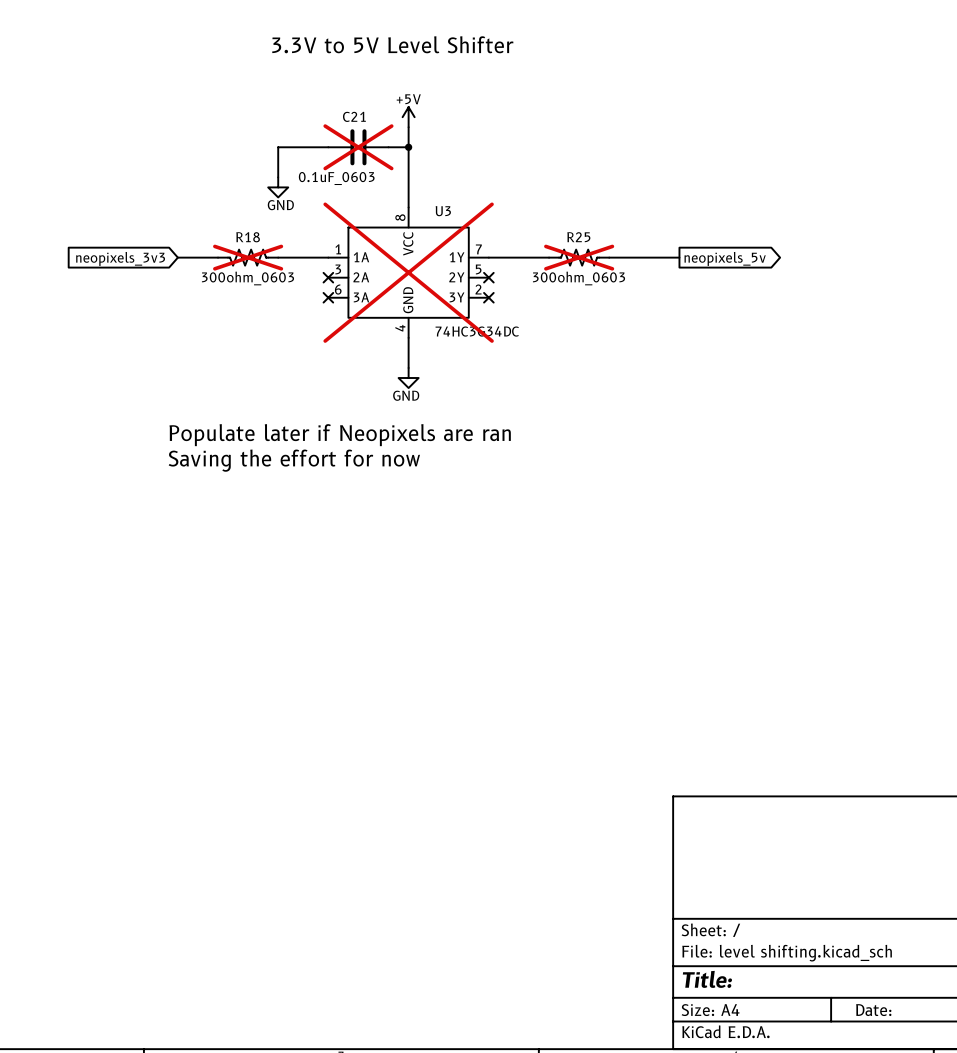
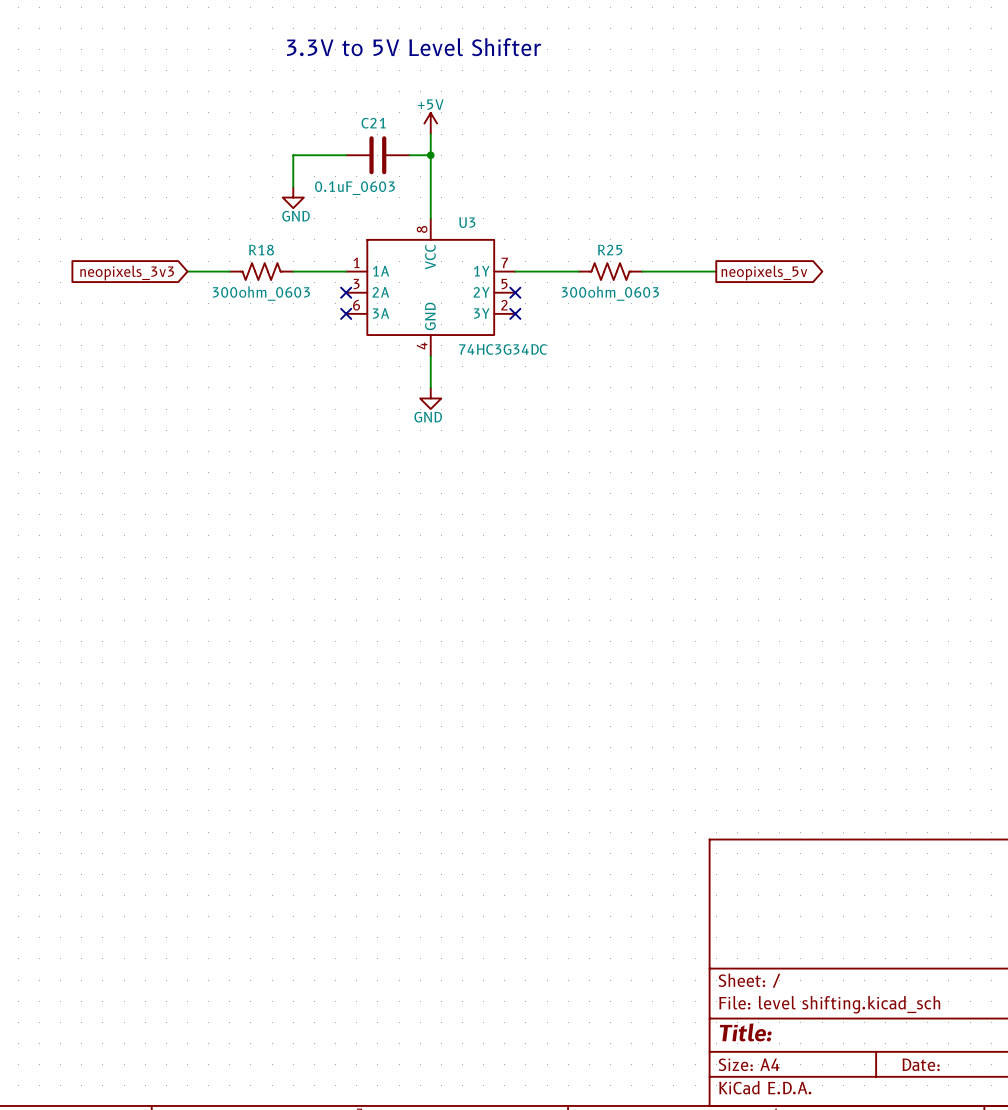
C21 do-not-place cross: (358, 147) -> none
R18 do-not-place cross: (248, 257) -> none
R25 do-not-place cross: (579, 257) -> none
U3 do-not-place cross: (408, 272) -> none
text: Populate later if Neopixels are ran (340, 435) -> none
text: Saving the effort for now (294, 460) -> none

